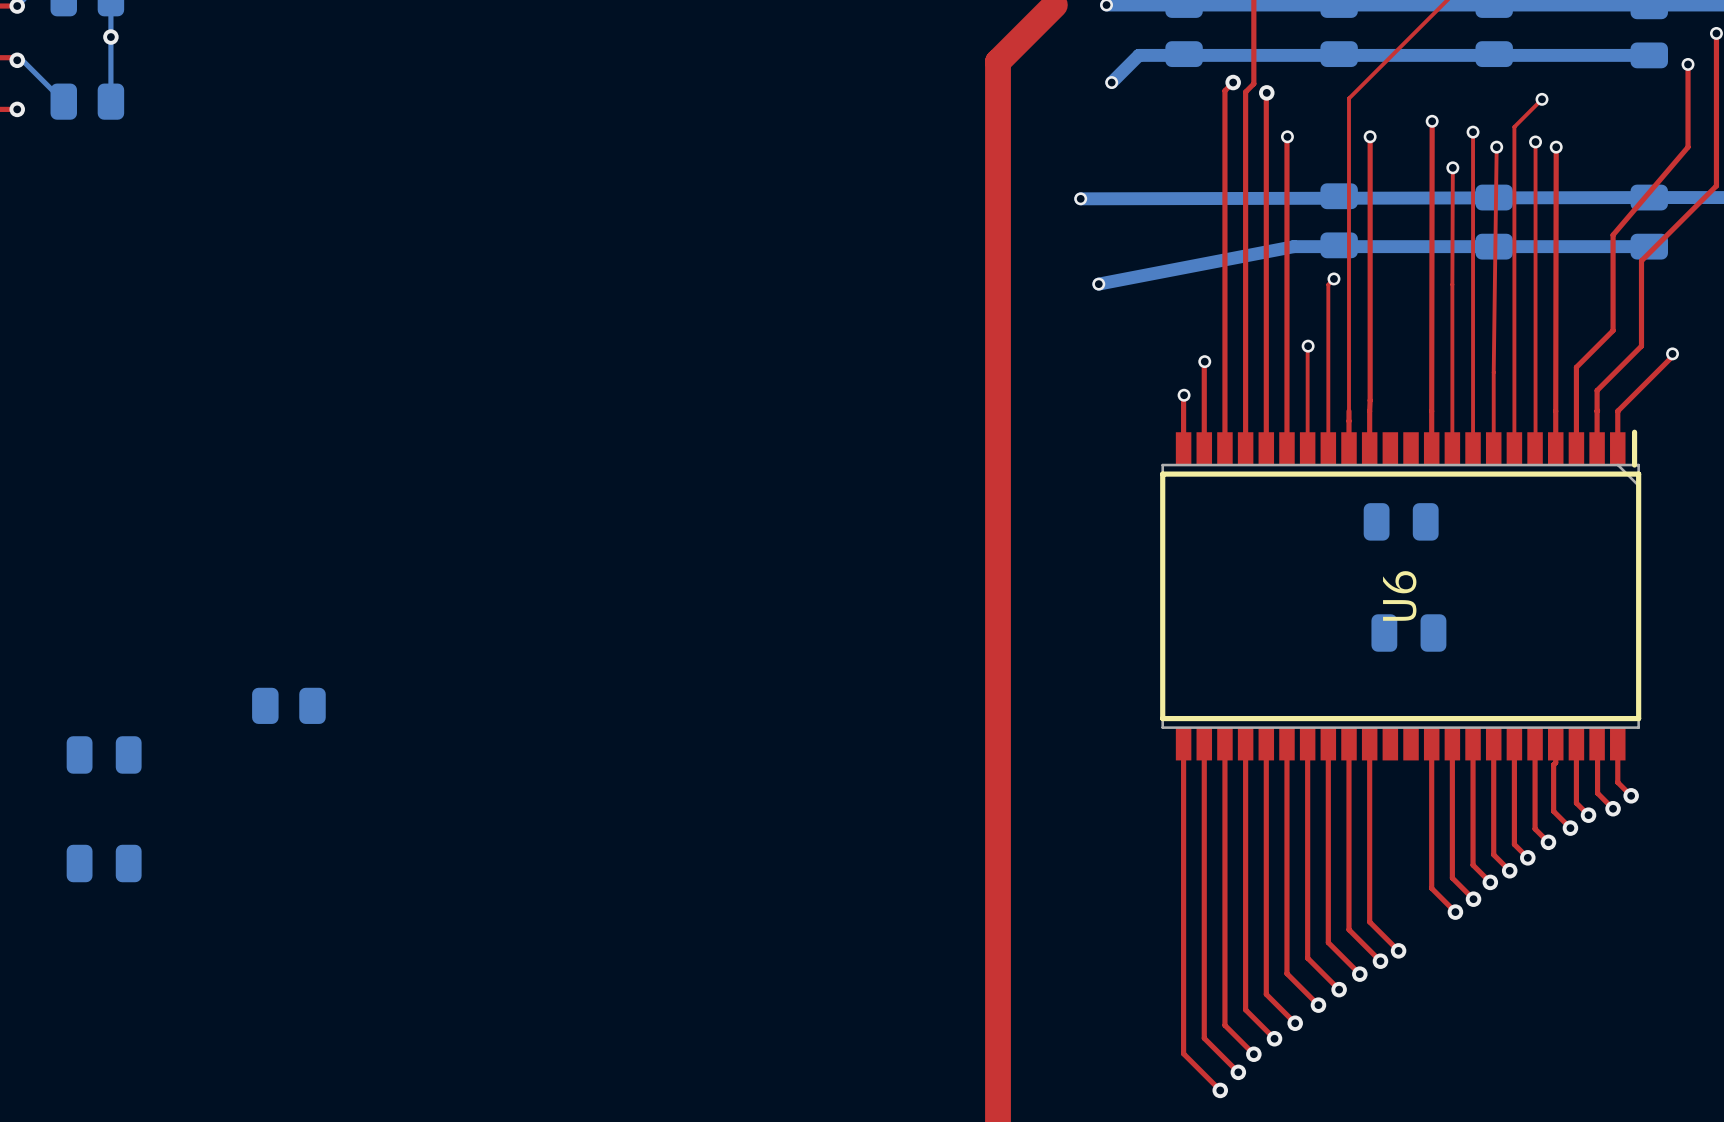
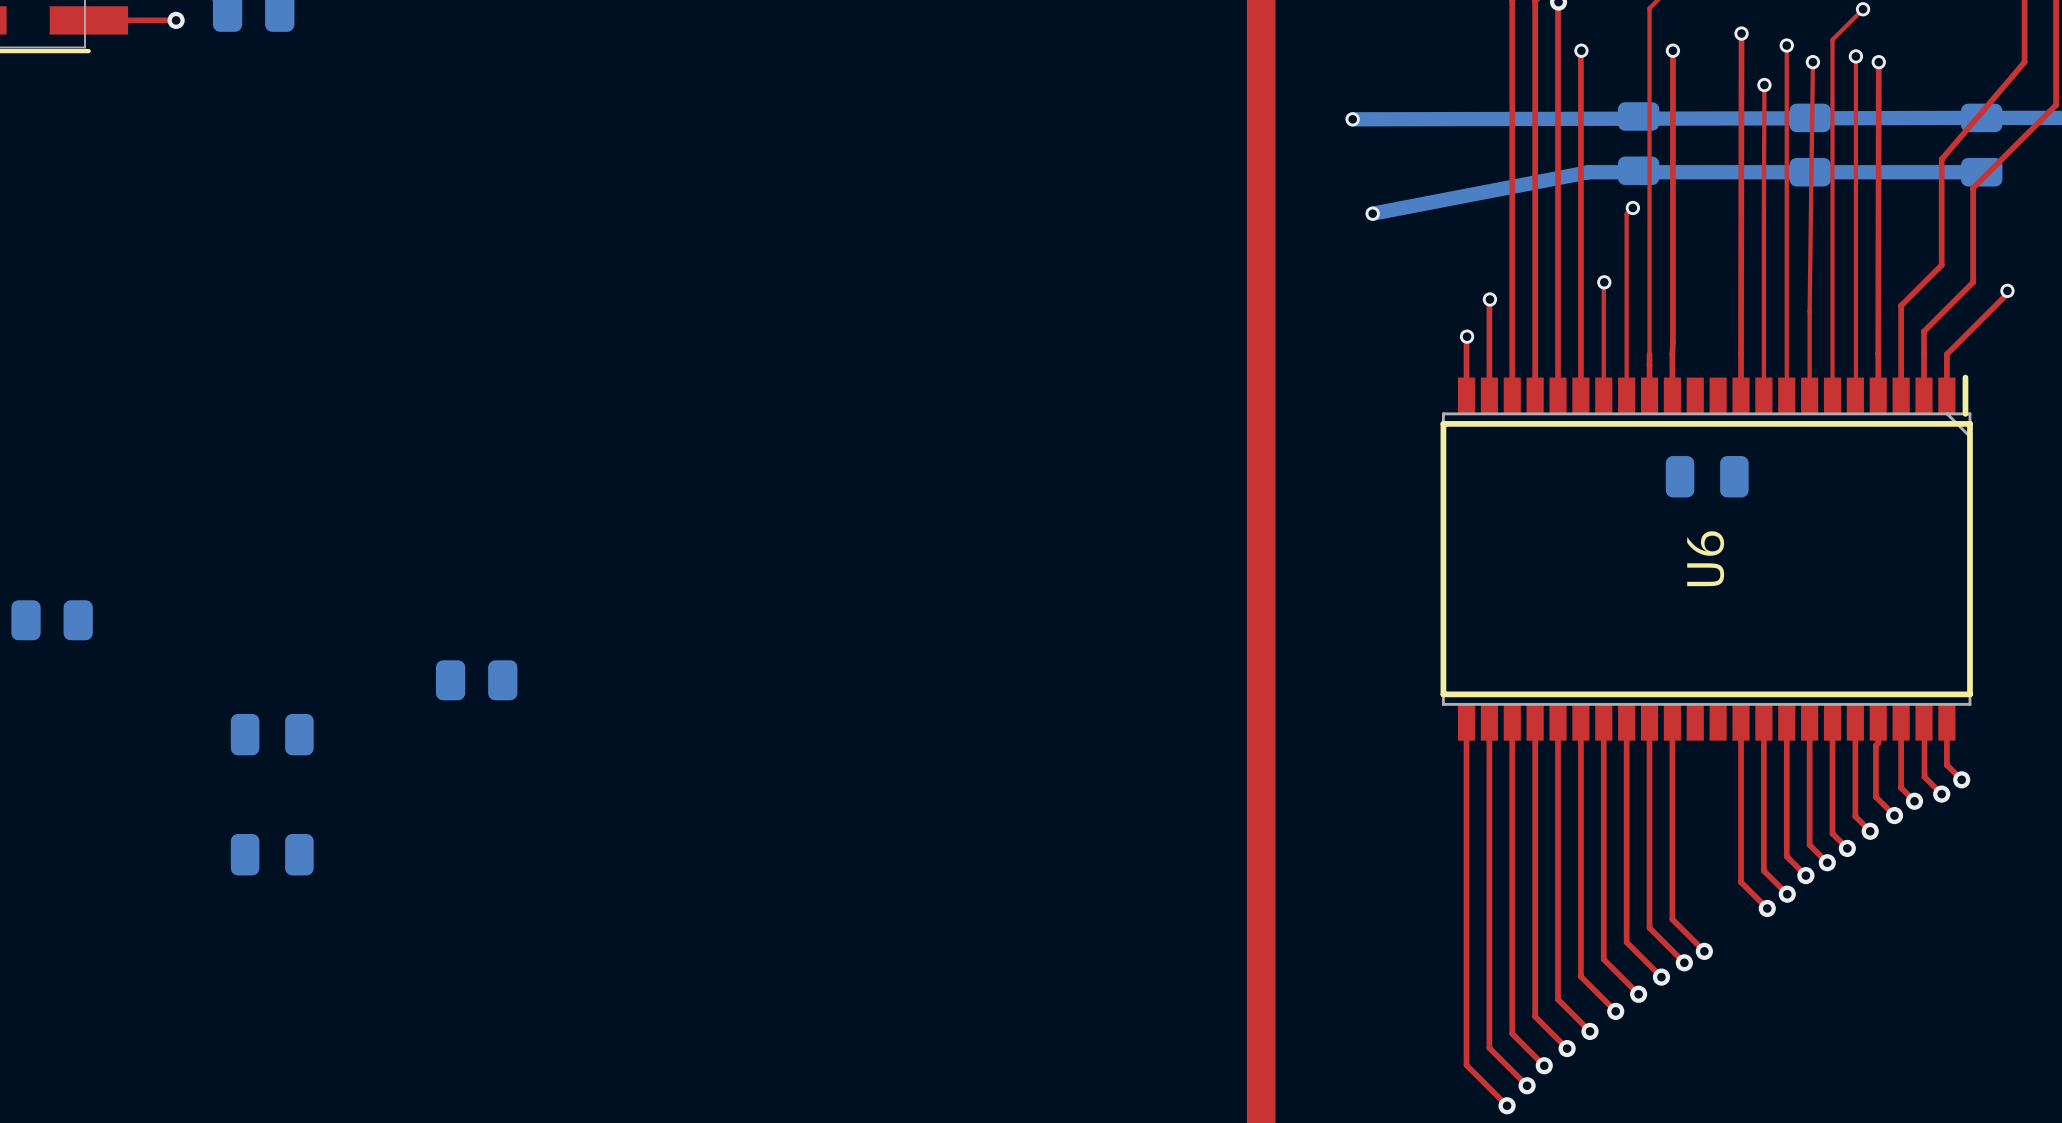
part: (1408, 633) -> none

